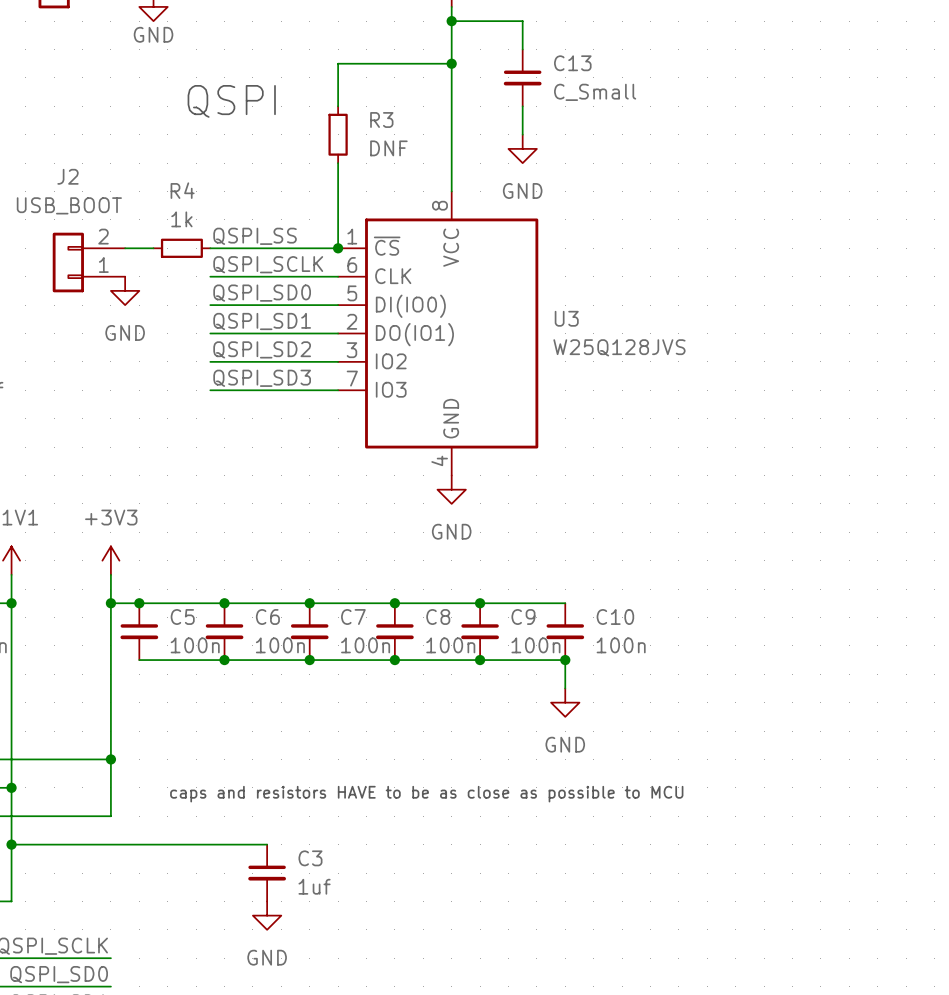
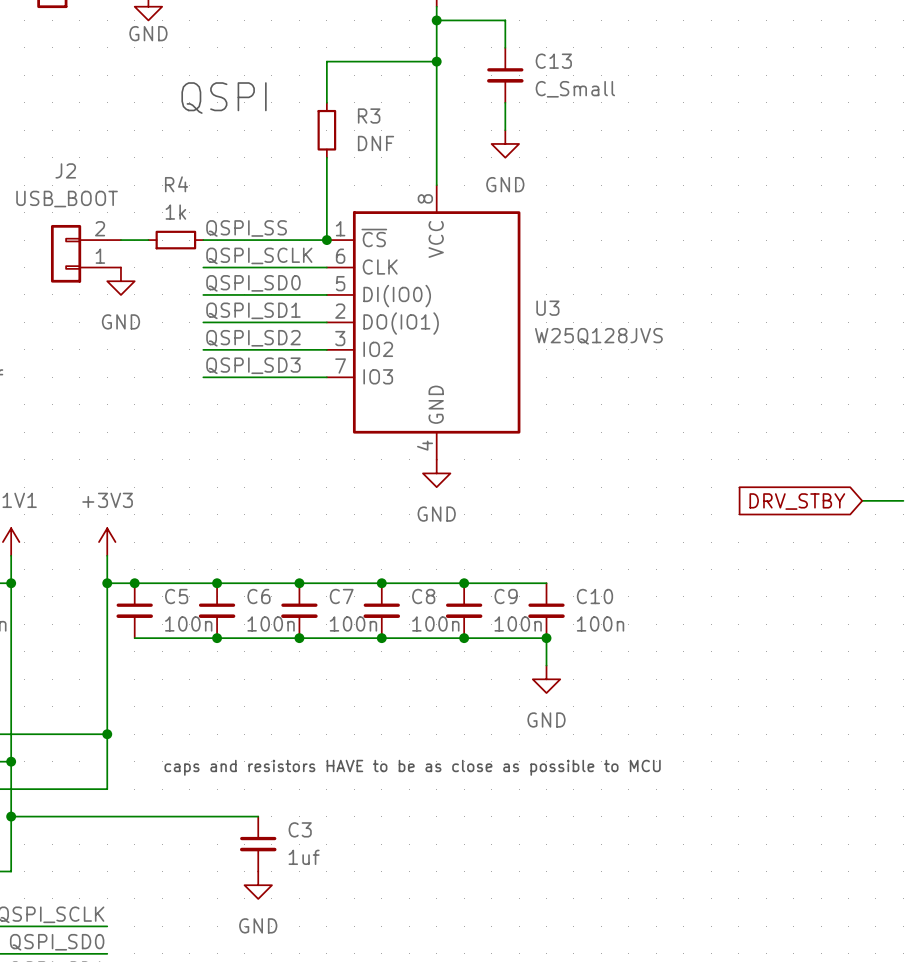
global label: none -> DRV_STBY (797, 501)
wire: none -> (862, 500) (903, 500)

